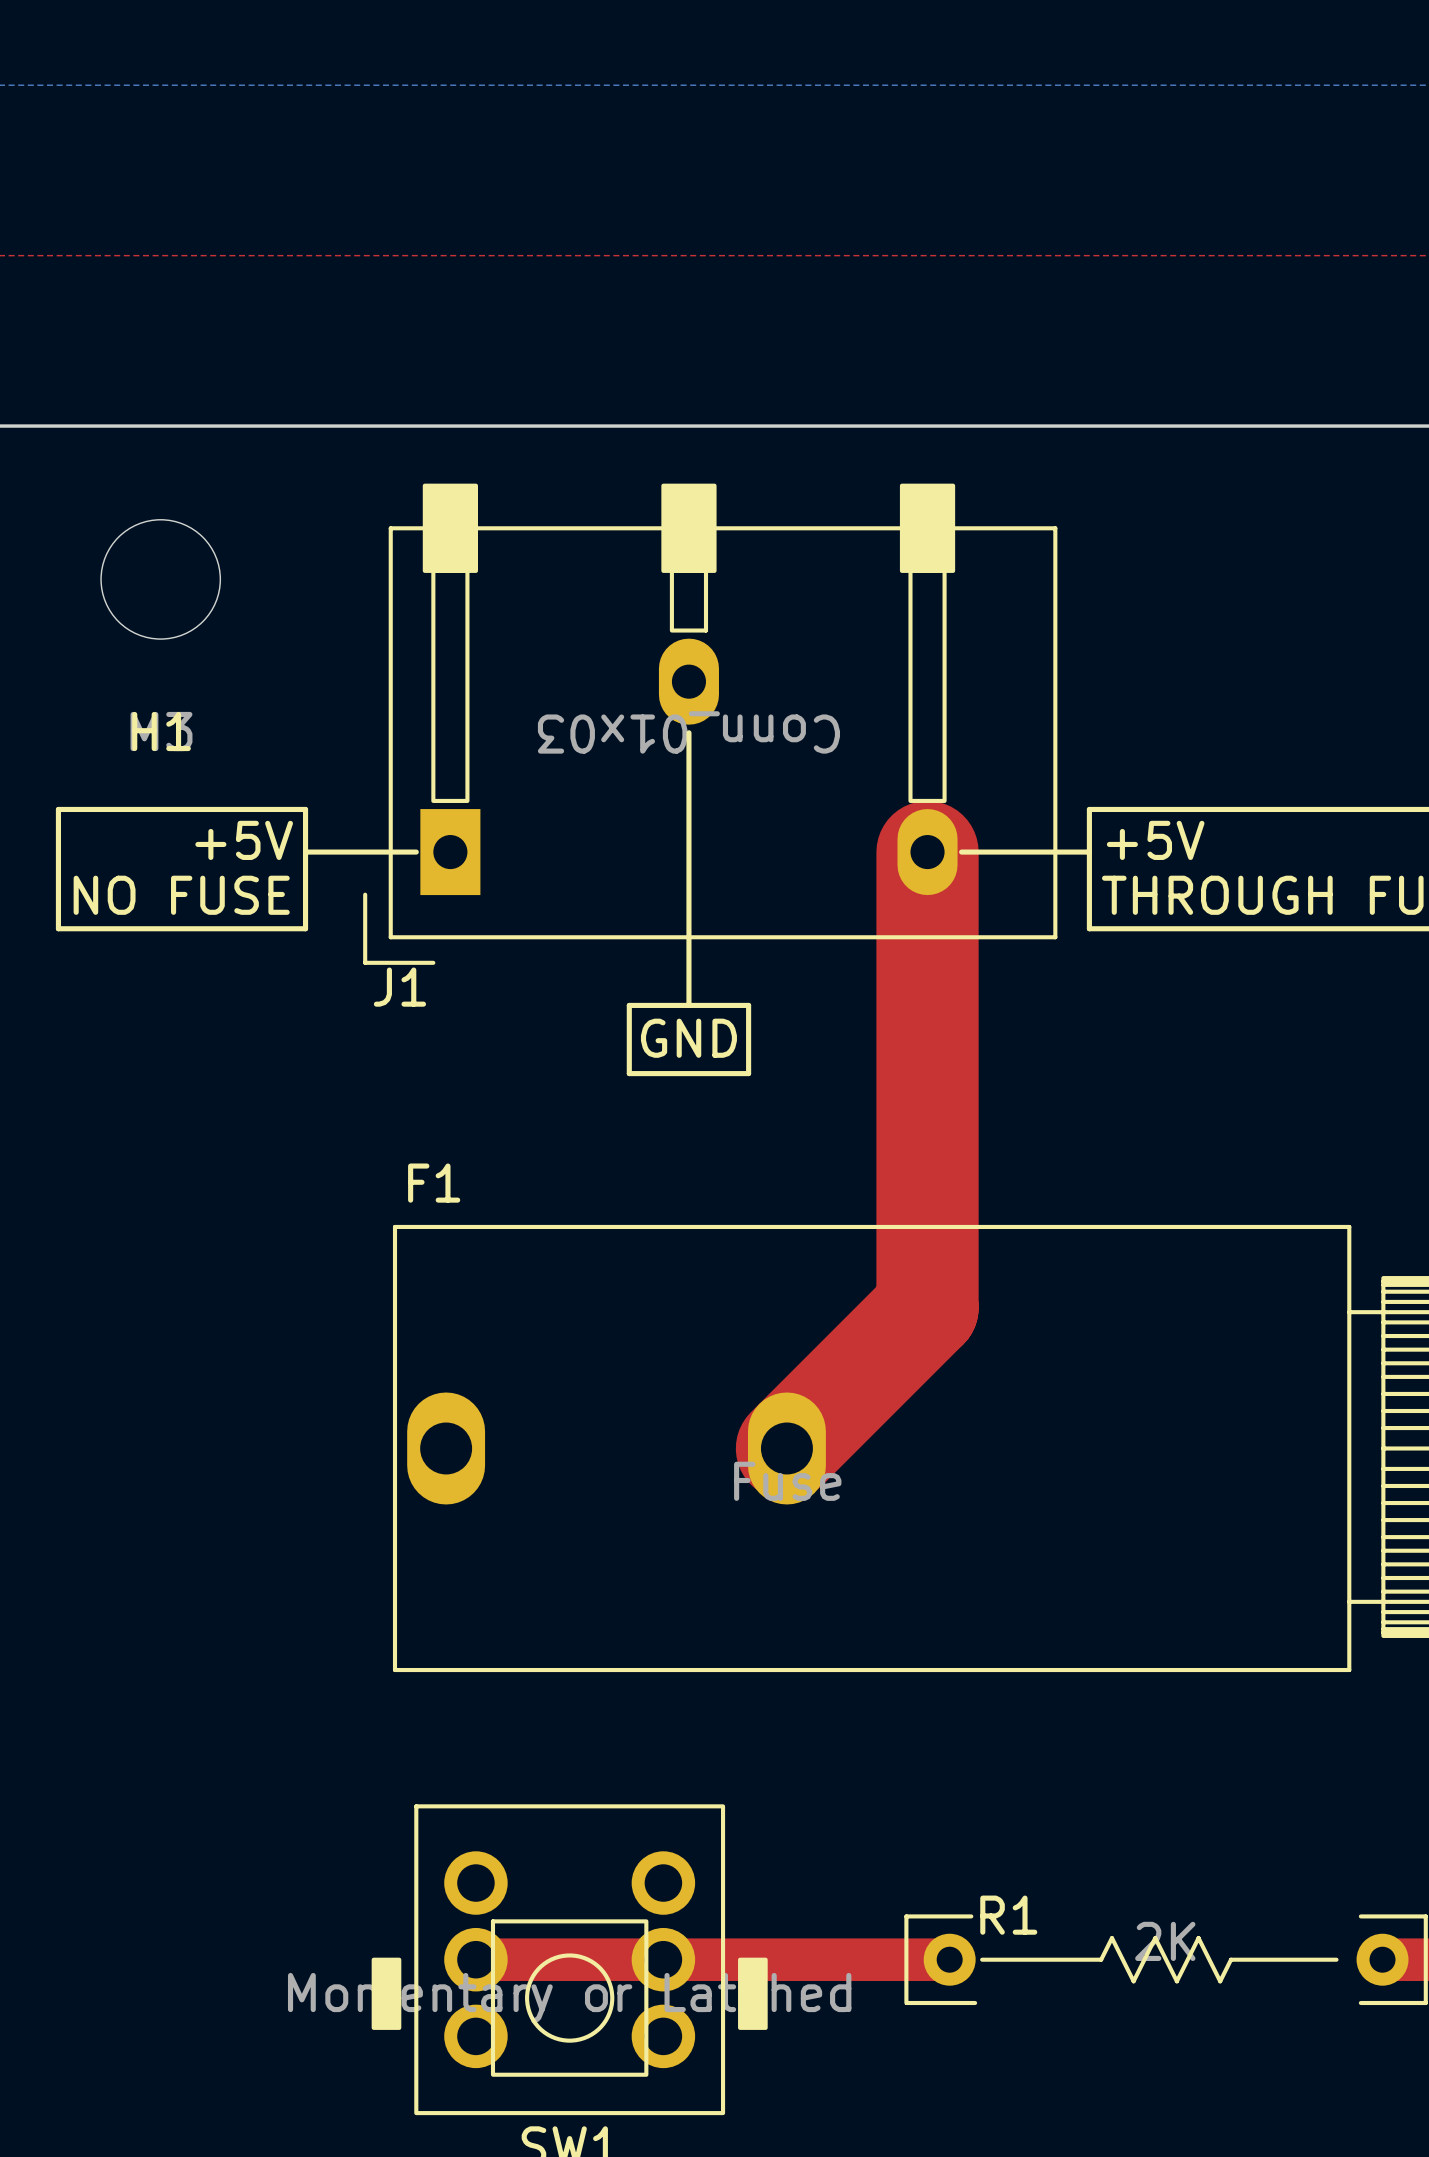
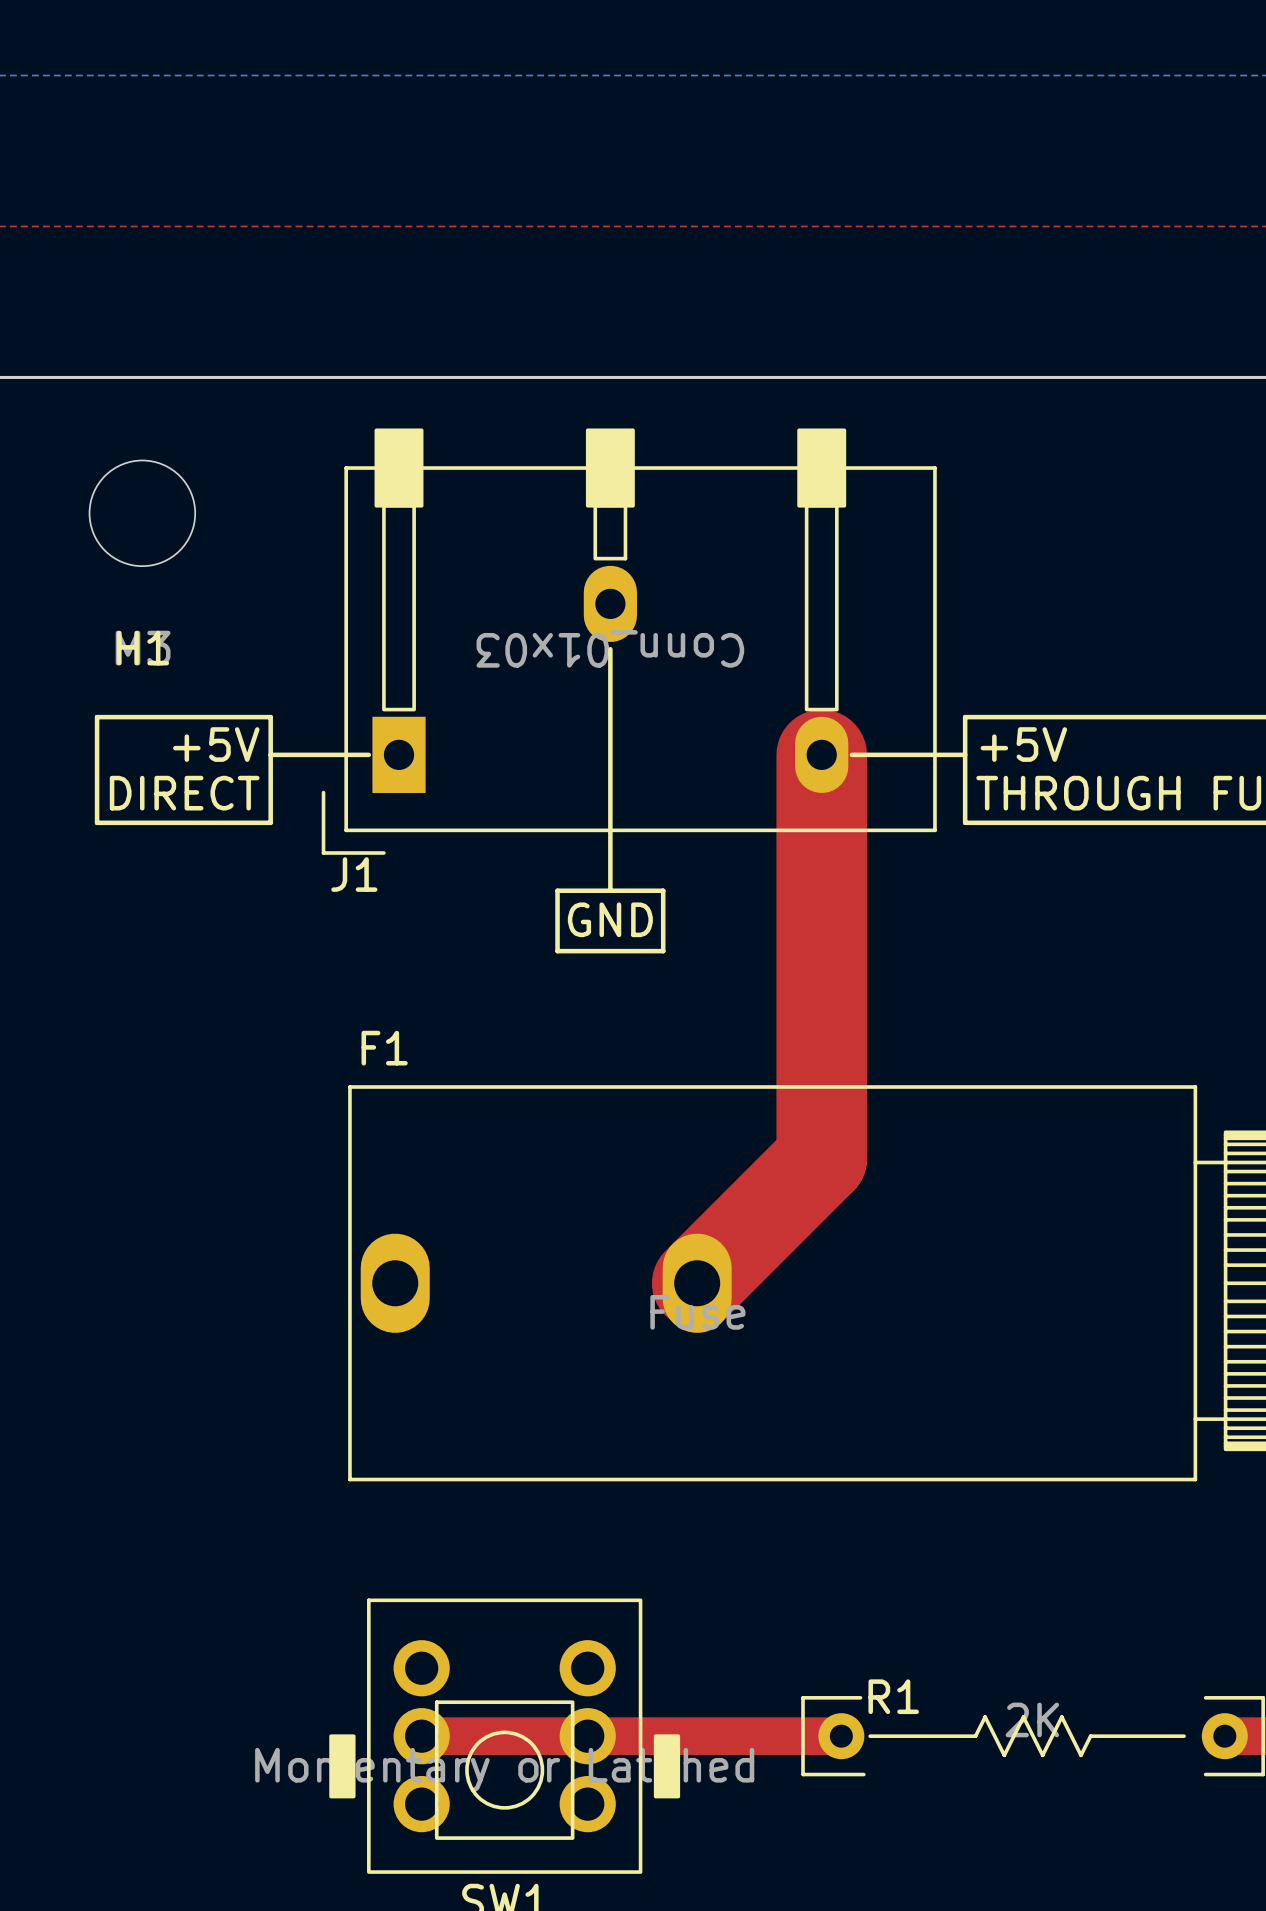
line: (109, 809) (58, 809) (58, 928) (109, 928) -> (97, 717) (97, 822)
text: NO FUSE (181, 895) -> DIRECT (184, 793)

